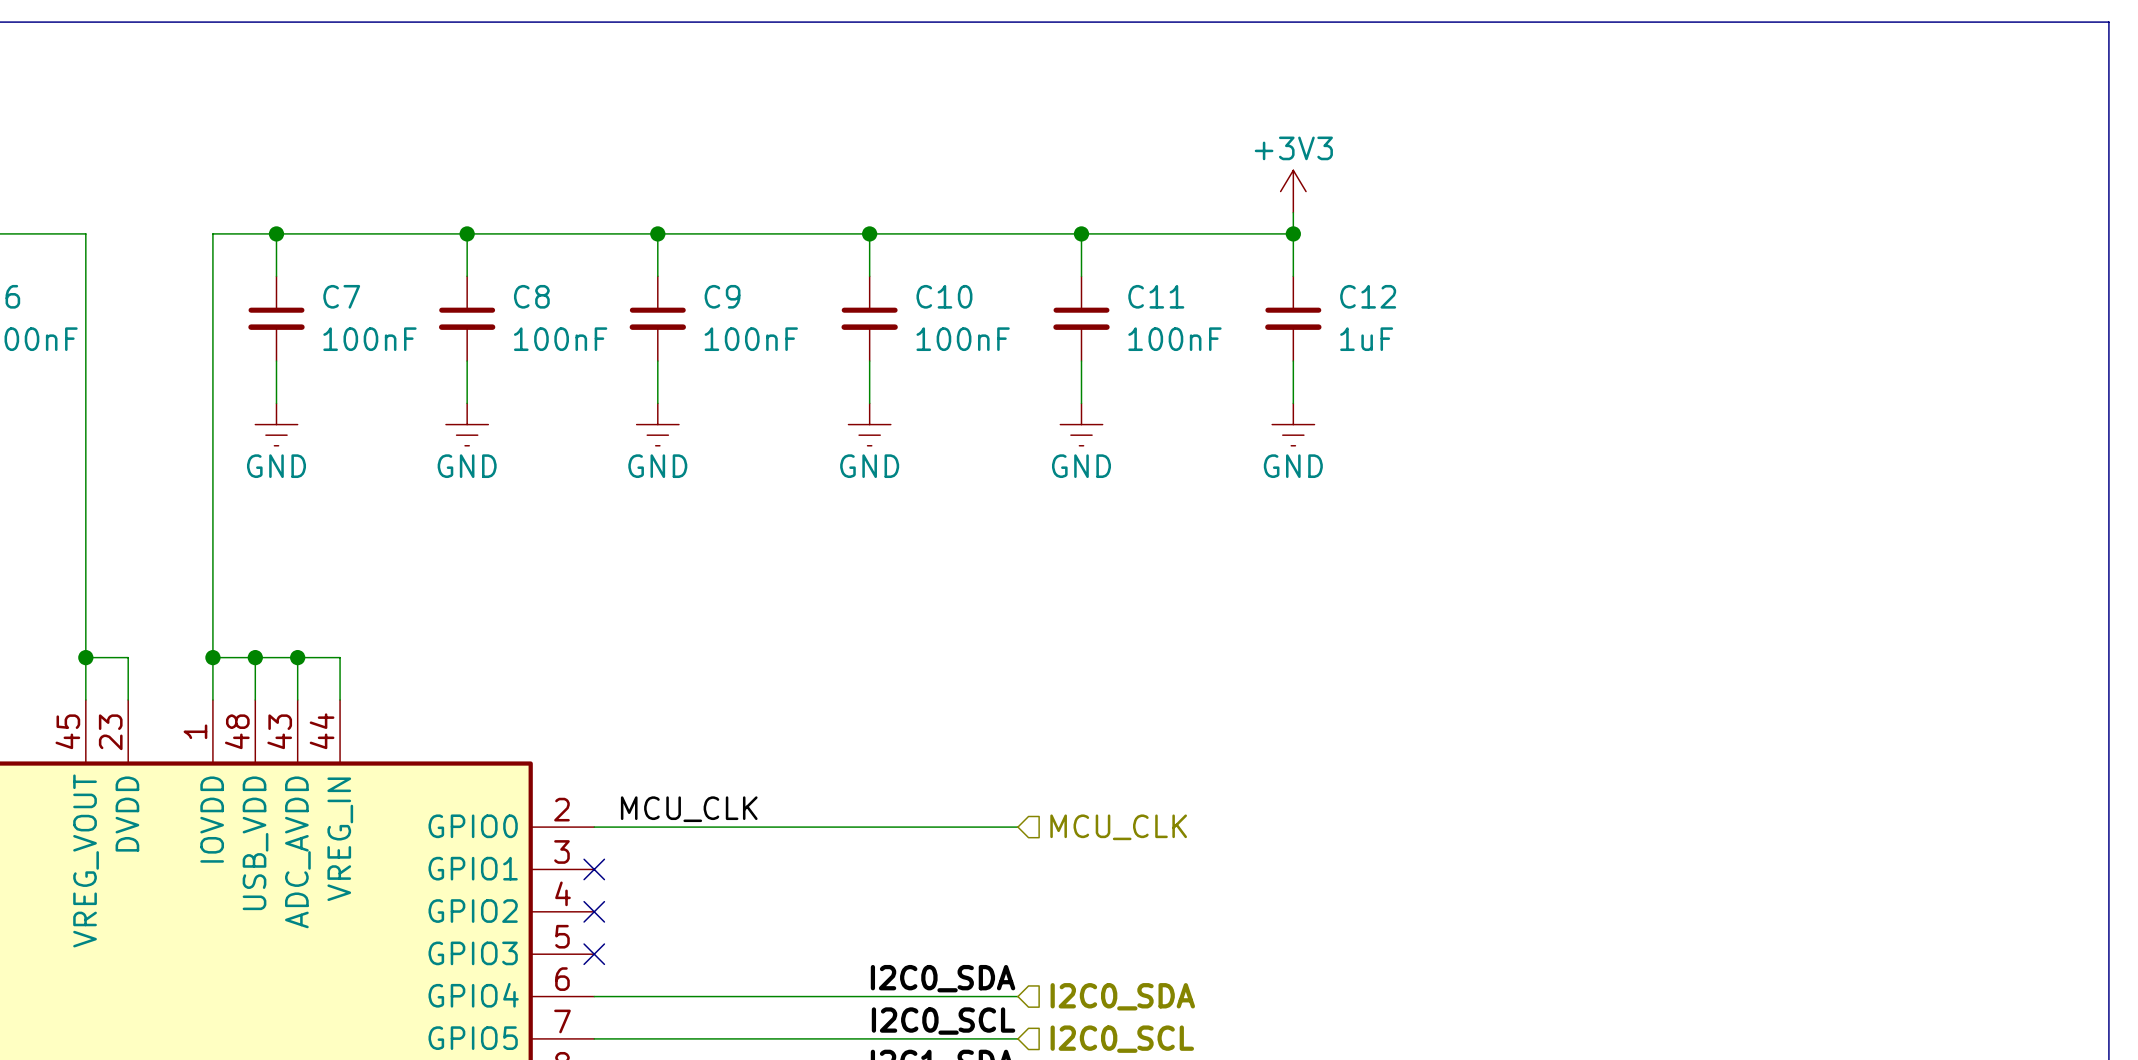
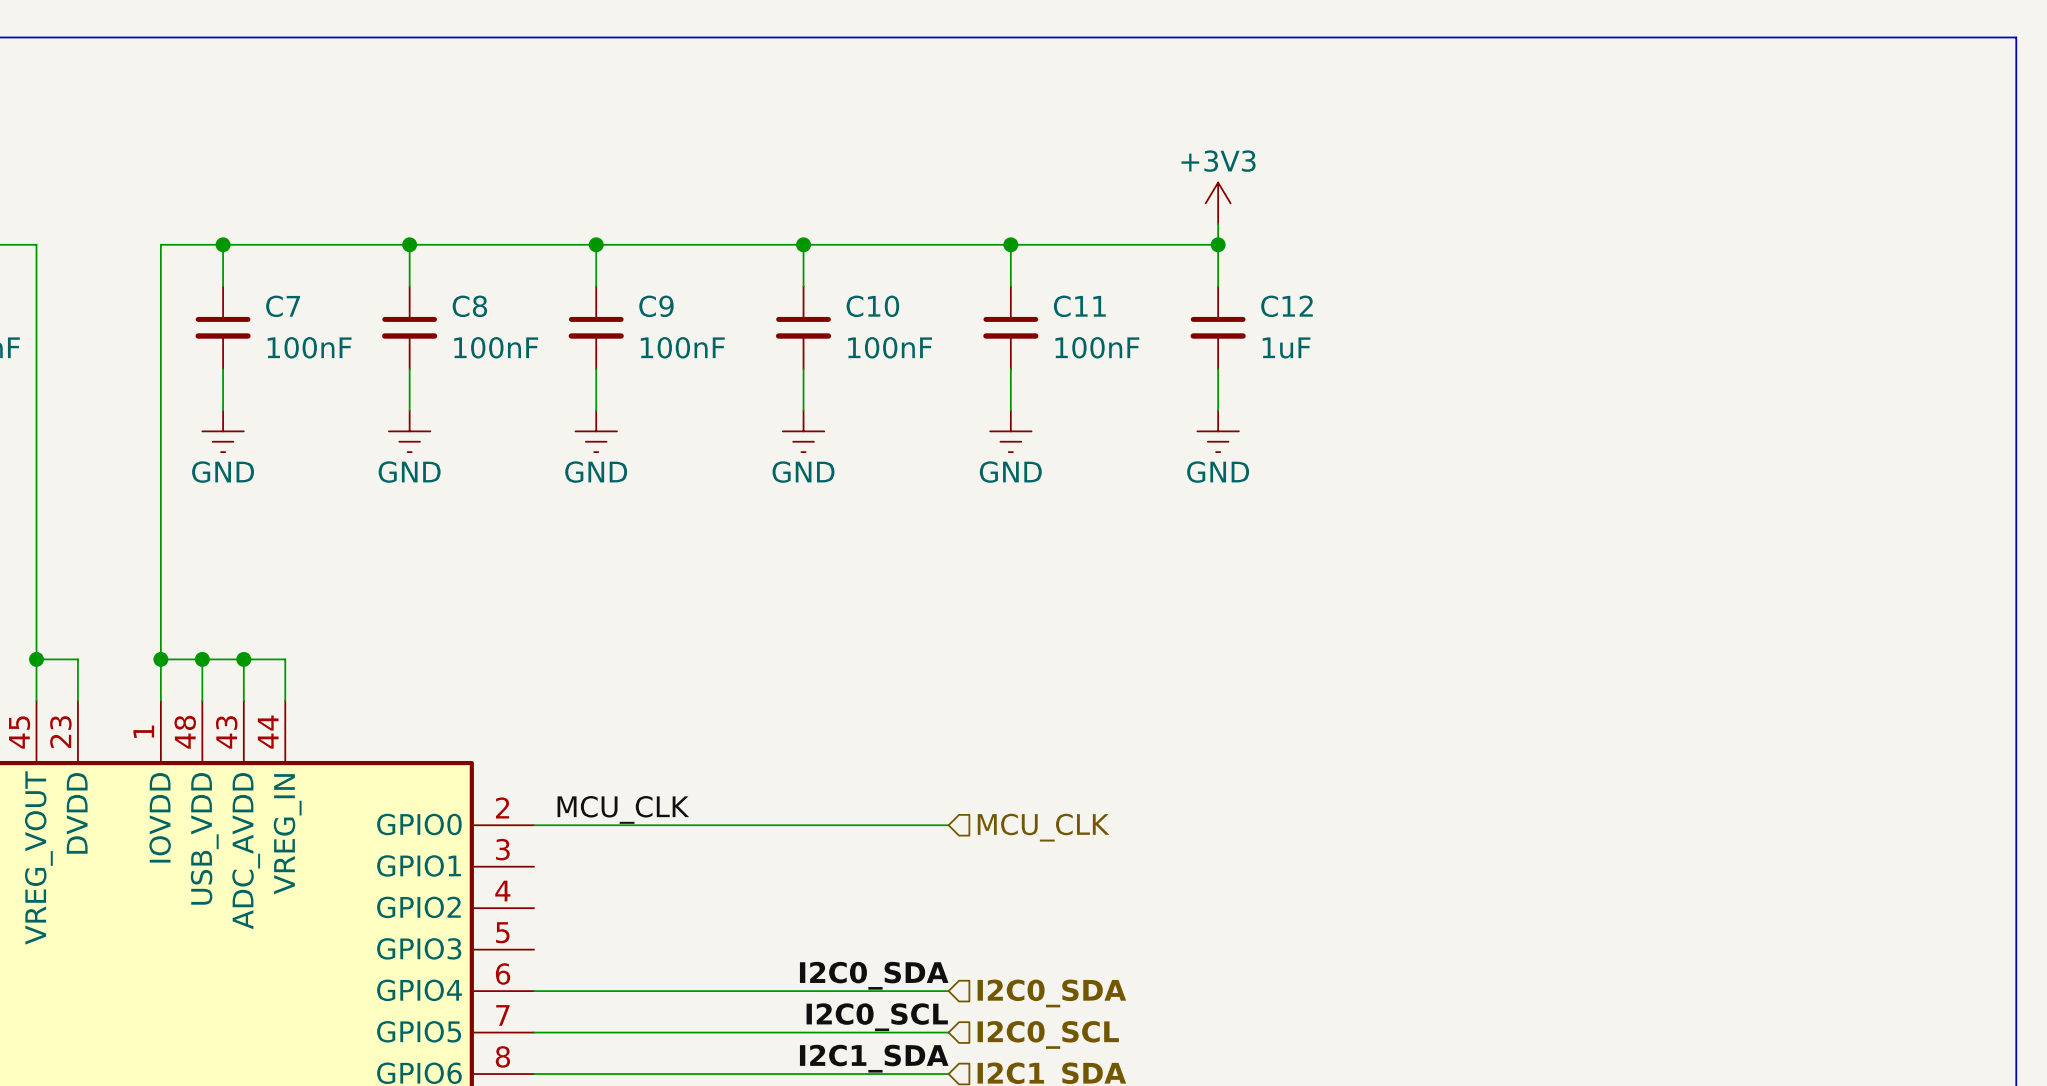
no-connect mark: (594, 869) -> none
no-connect mark: (594, 911) -> none
no-connect mark: (594, 954) -> none

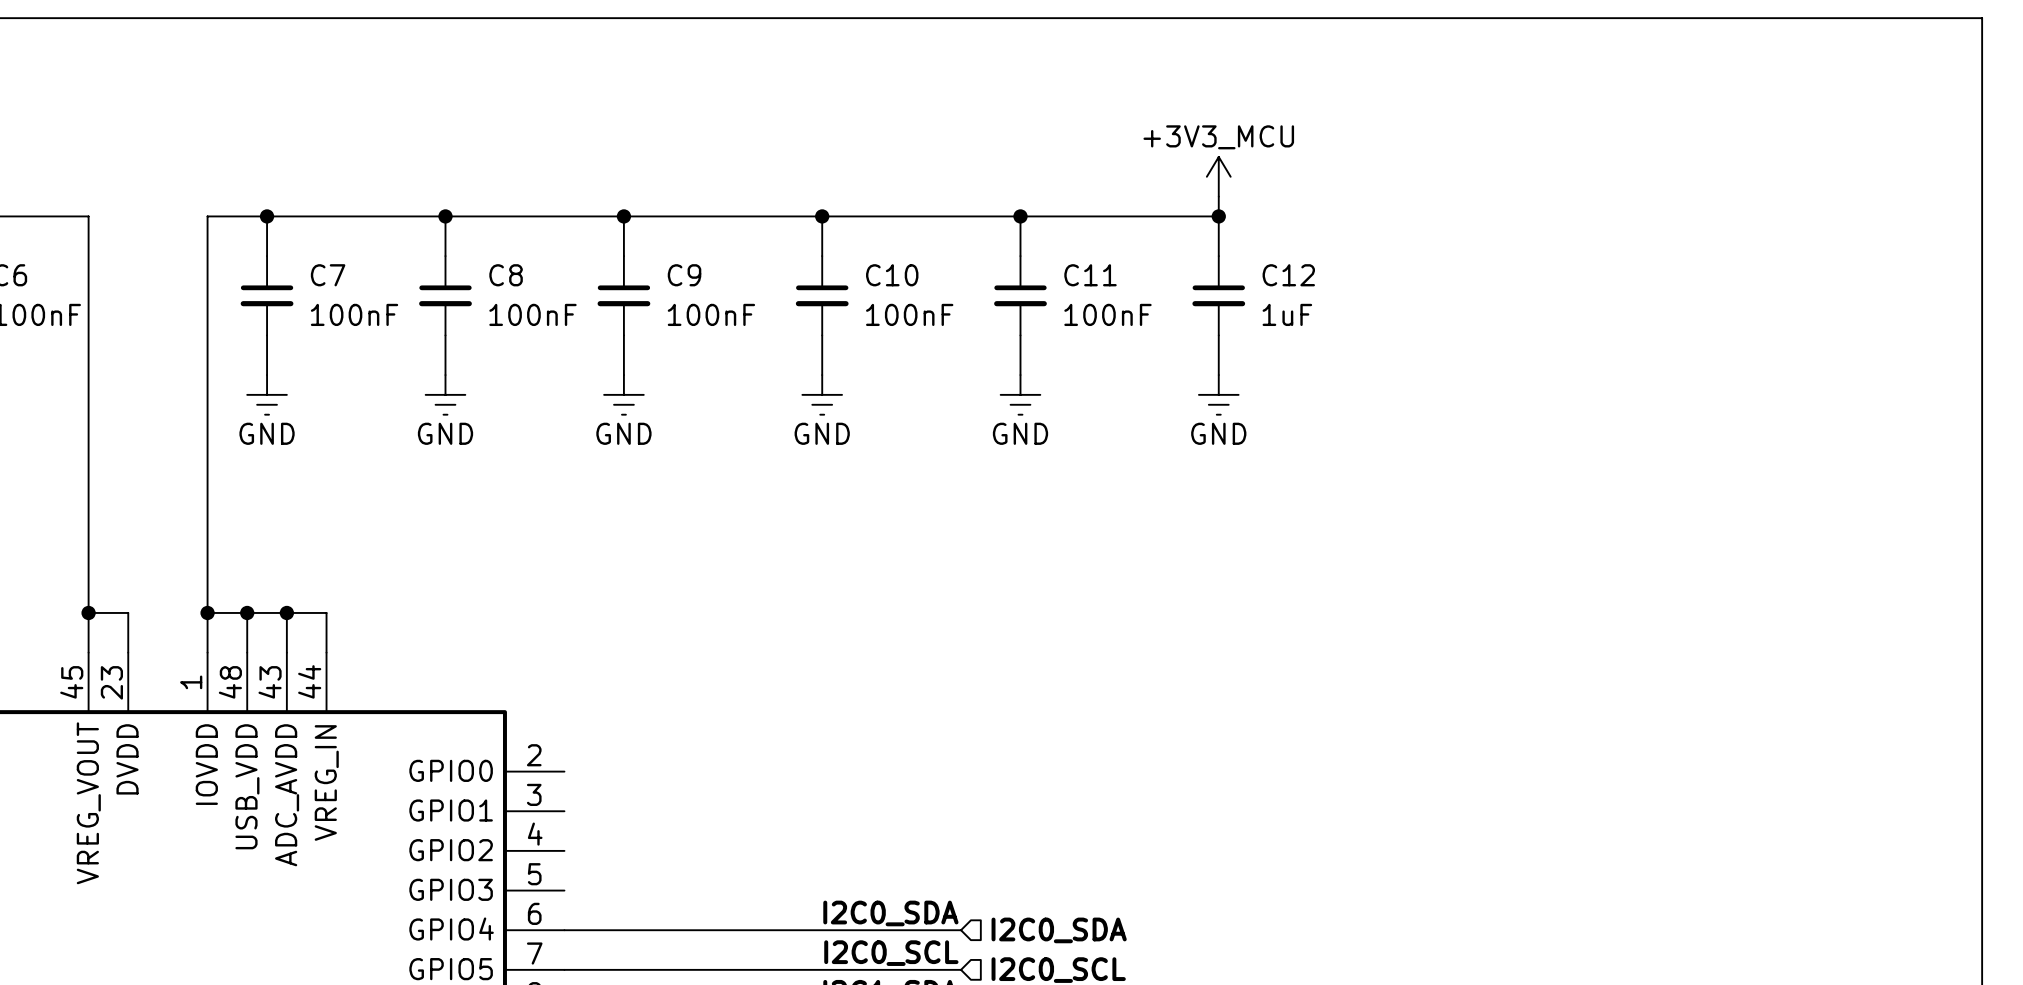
power symbol: +3V3 (1218, 203) -> +3V3_MCU (1218, 176)
label: MCU_CLK (623, 809) -> none
wire: (534, 825) (948, 825) -> none
hierarchical label: MCU_CLK (1043, 827) -> none

